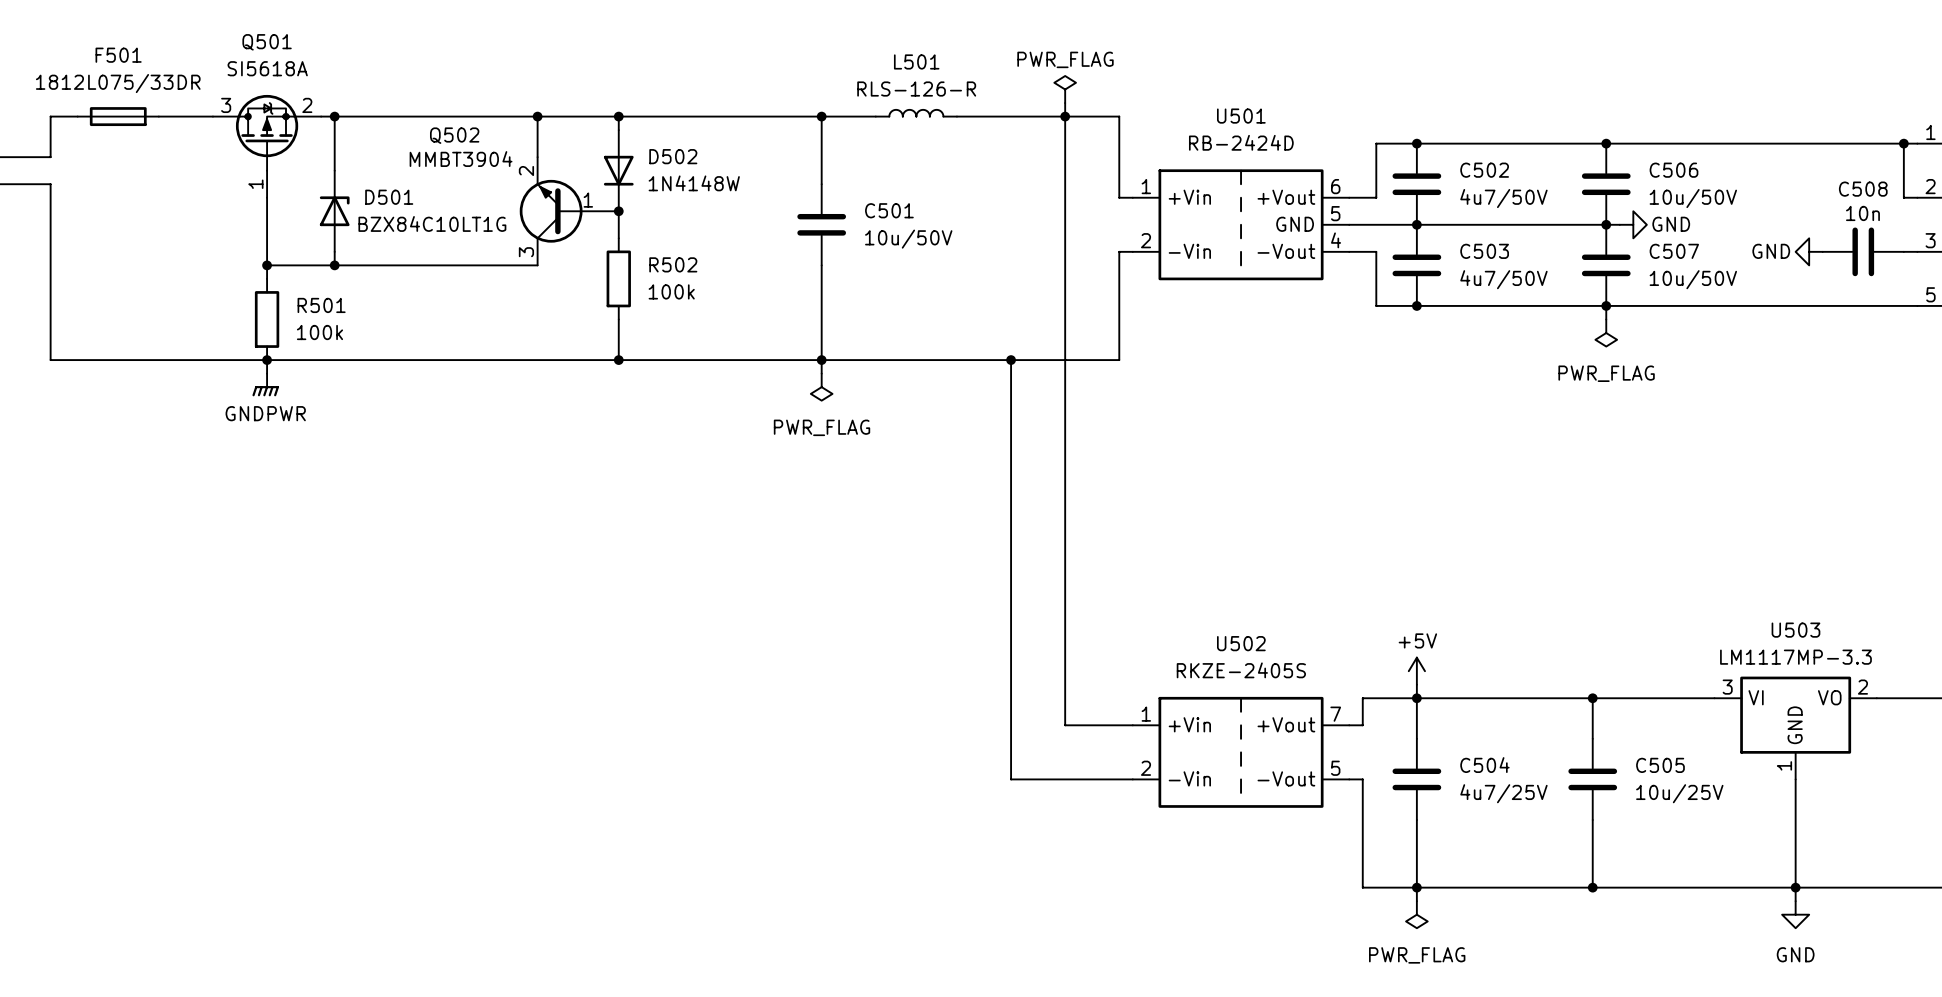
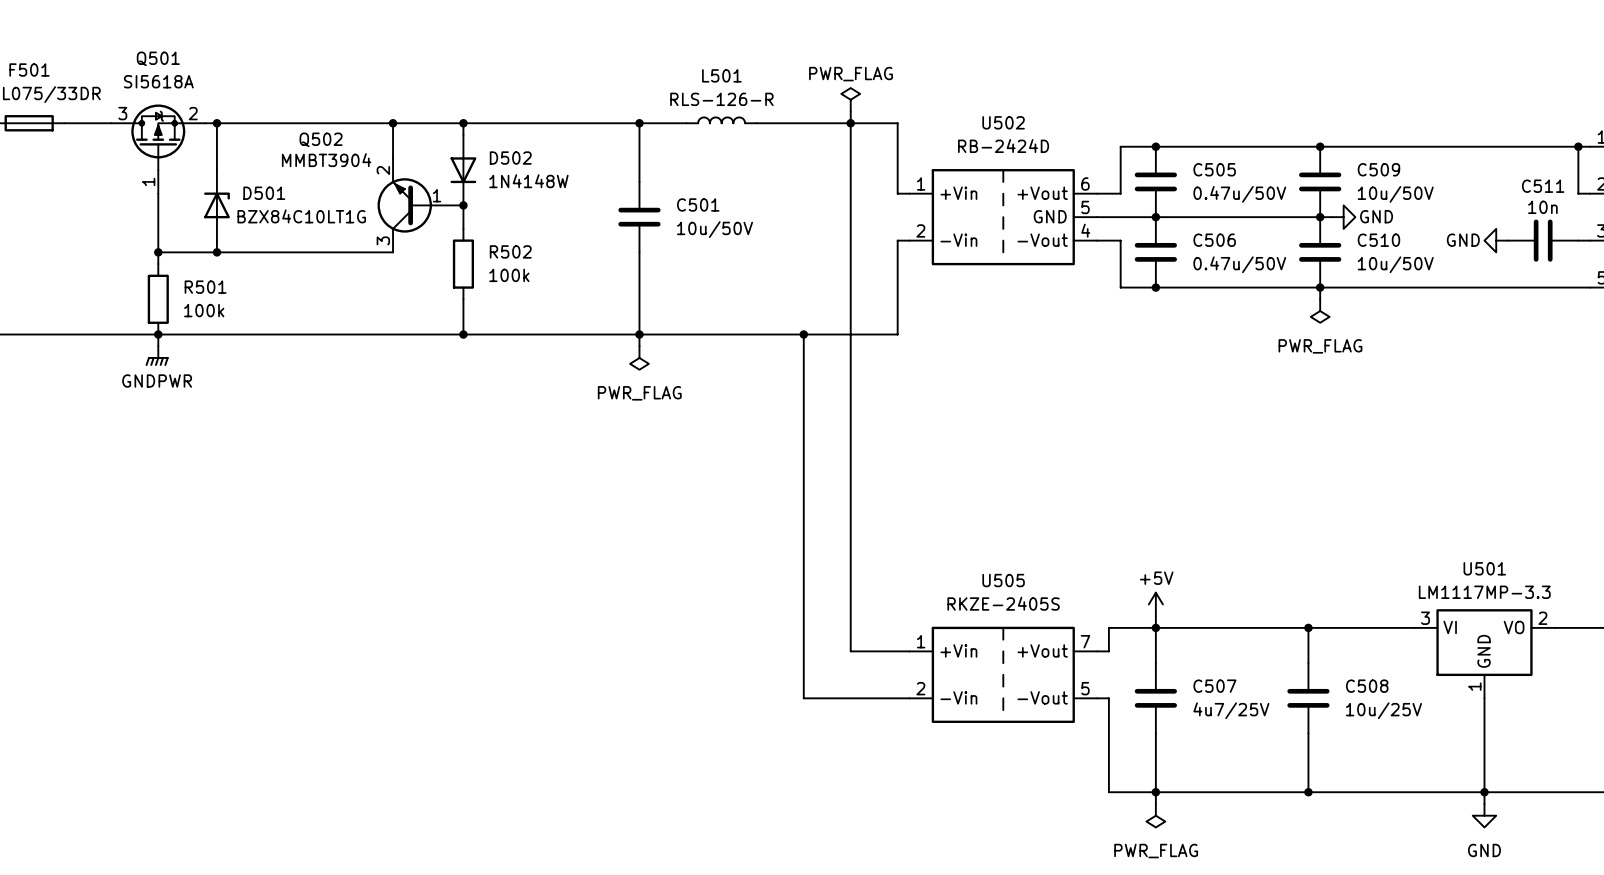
U501 name: U501 (1241, 116) -> U502 (1003, 122)
C502 name: C502 (1484, 170) -> C505 (1214, 169)
C506 name: C506 (1674, 170) -> C509 (1378, 169)
C508 name: C508 (1863, 189) -> C511 (1543, 186)
C502 value: 4u7/50V (1503, 198) -> 0.47u/50V (1239, 194)
C503 name: C503 (1484, 251) -> C506 (1214, 240)
C507 name: C507 (1674, 251) -> C510 (1378, 240)
C503 value: 4u7/50V (1503, 279) -> 0.47u/50V (1239, 264)
U503 name: U503 (1795, 630) -> U501 (1484, 568)
U502 name: U502 (1241, 643) -> U505 (1003, 580)
C504 name: C504 (1484, 765) -> C507 (1214, 686)
C505 name: C505 (1660, 765) -> C508 (1367, 686)

